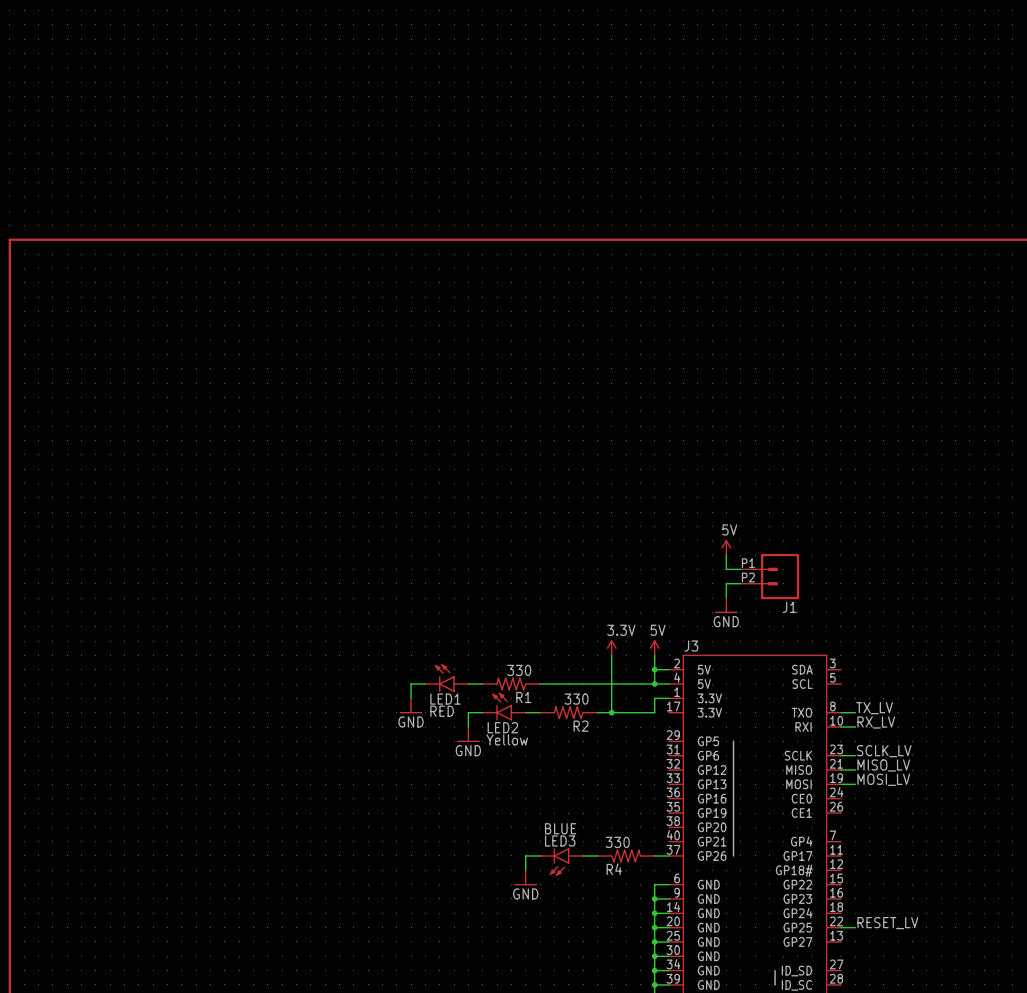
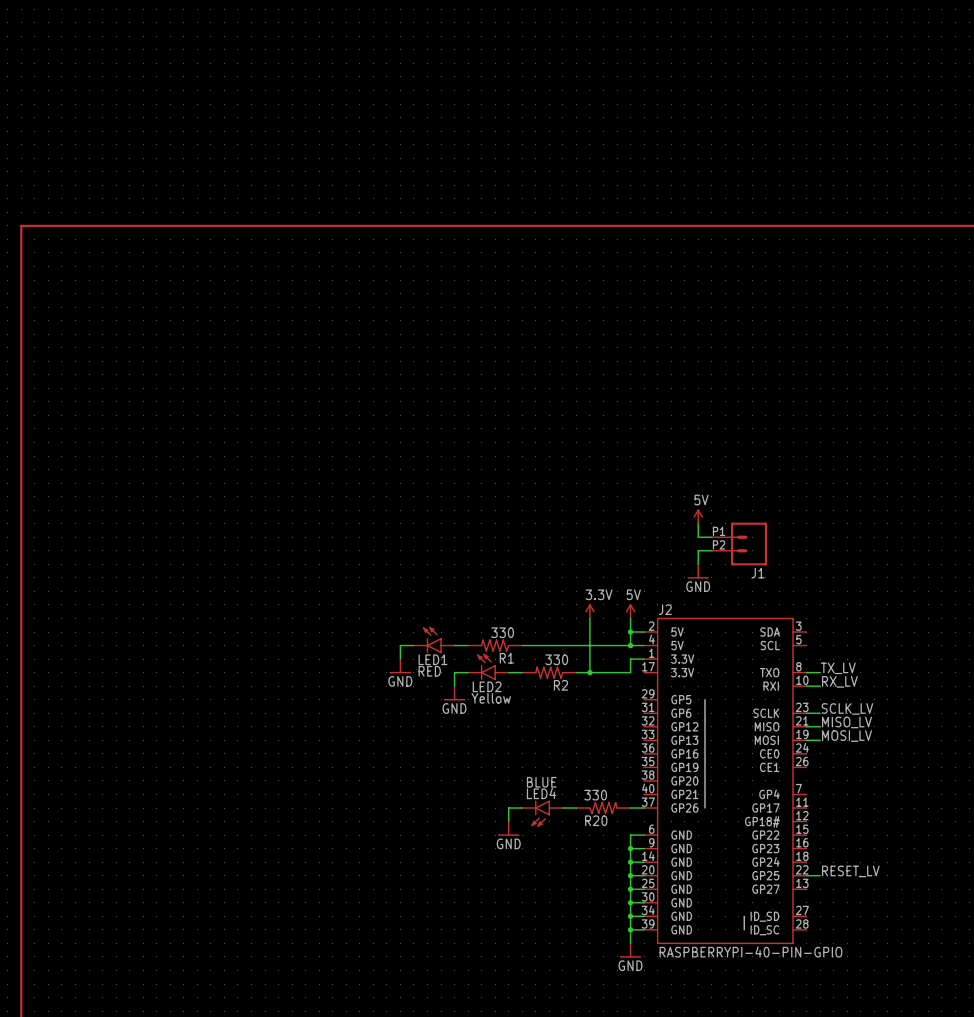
J3 name: J3 (691, 646) -> J2 (665, 609)
LED3 name: LED3 (560, 840) -> LED4 (541, 793)
R4 name: R4 (614, 869) -> R20 (596, 820)

